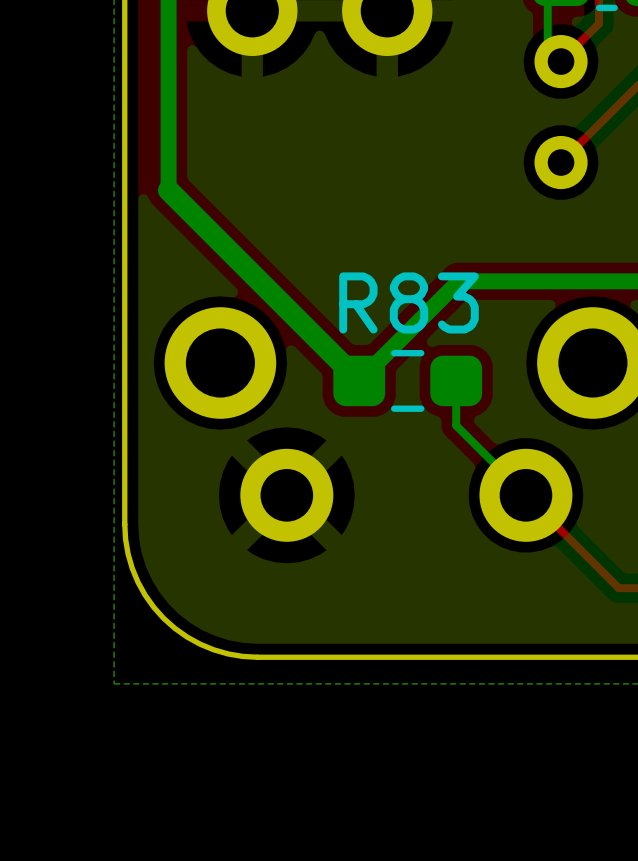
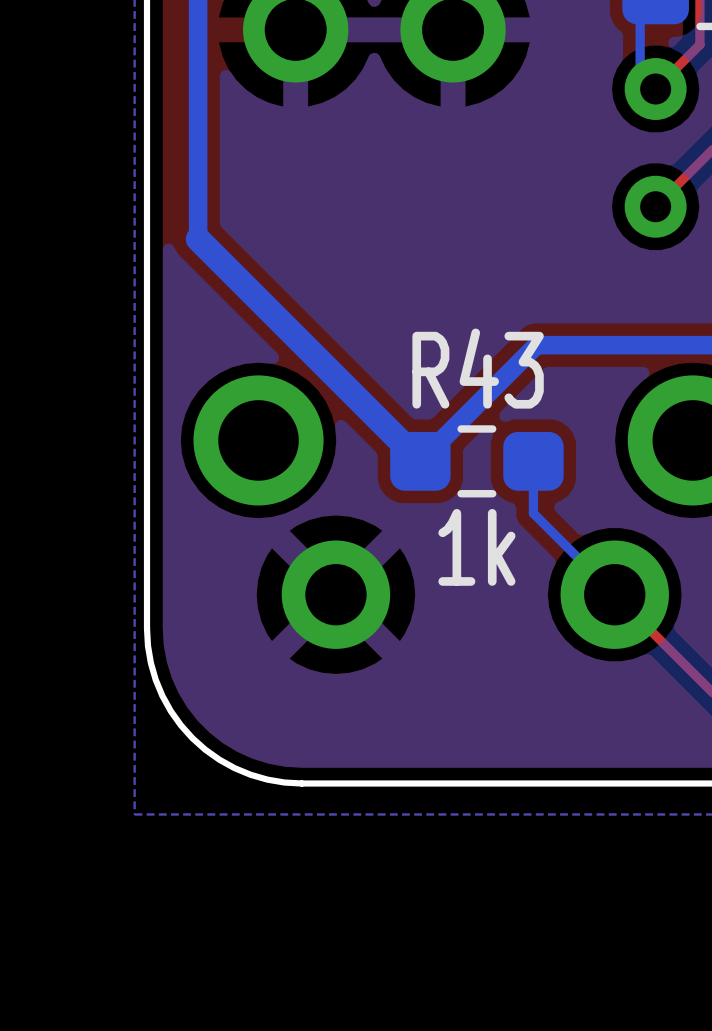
R83 name: R83 (408, 302) -> R43 (478, 368)
R83 text: none -> 1k (476, 547)

